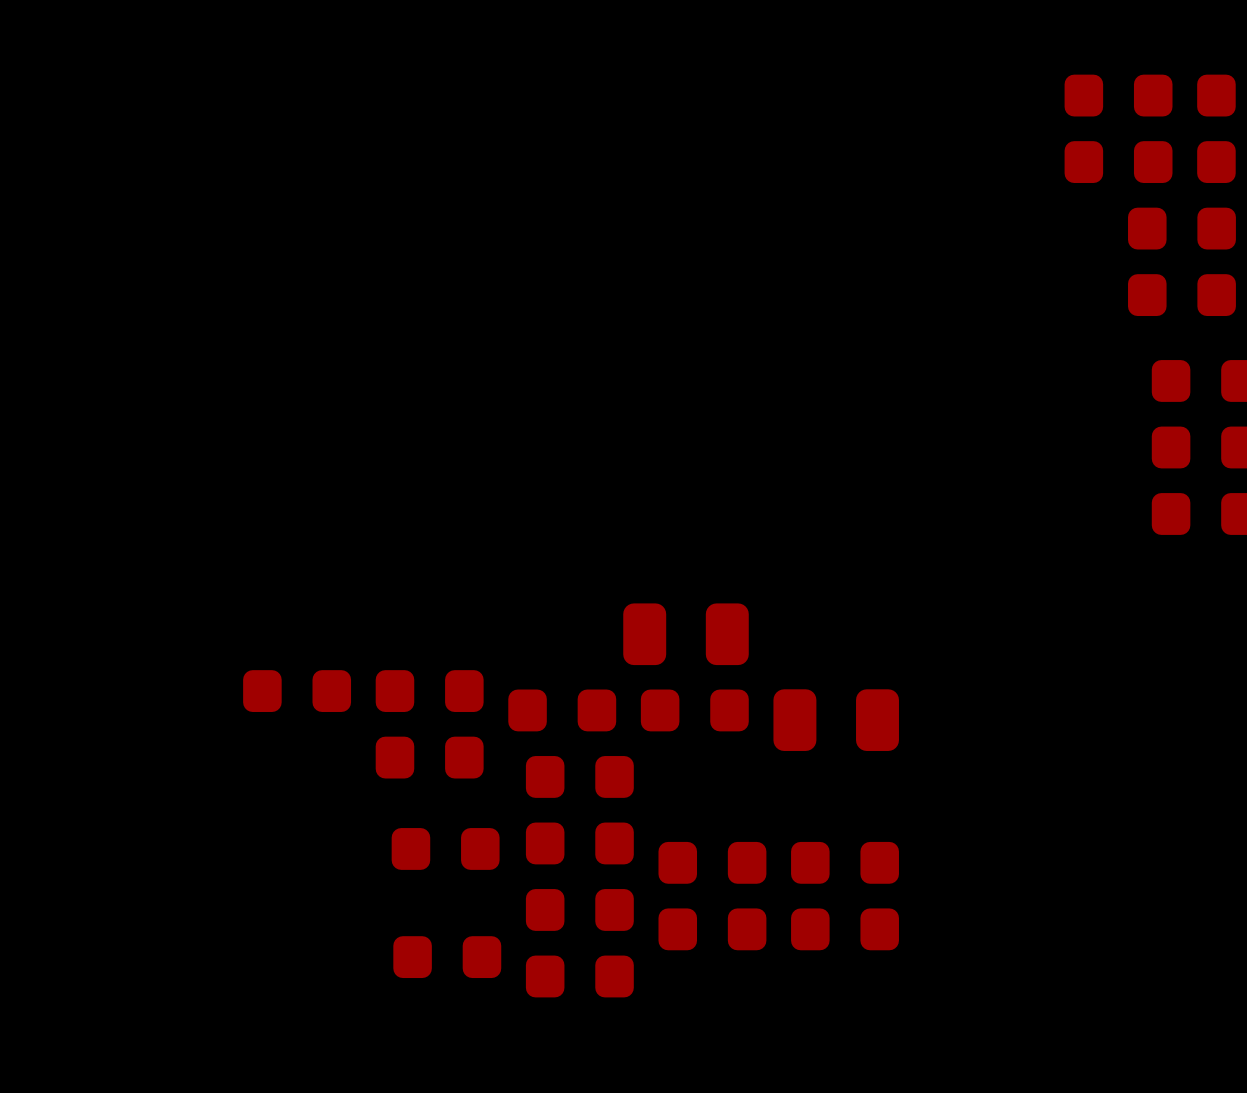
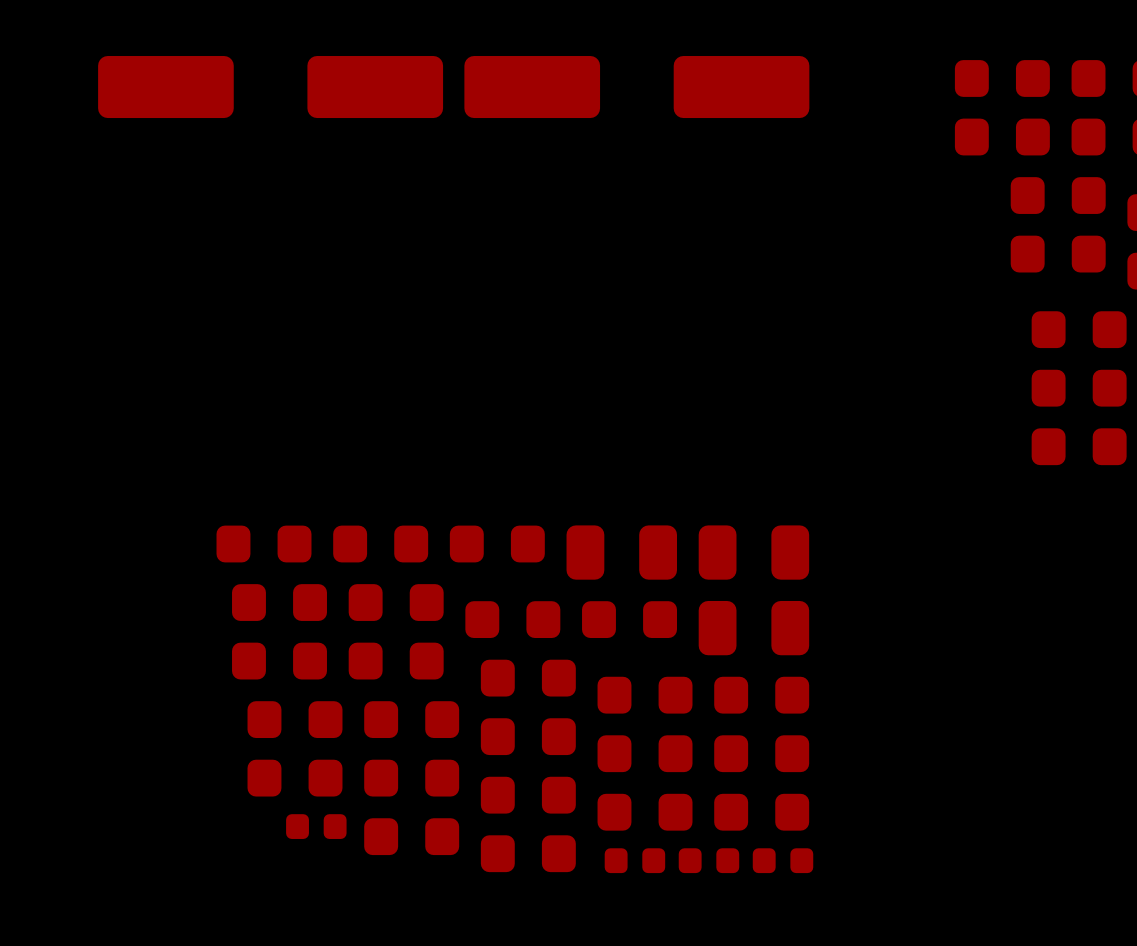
part: none -> (270, 87)
part: none -> (636, 87)
part: none -> (263, 544)
part: none -> (380, 544)
part: none -> (497, 544)
part: none -> (753, 552)
part: none -> (279, 661)
part: none -> (645, 695)
part: none -> (761, 695)
part: none -> (295, 719)
part: none -> (411, 719)
part: (445, 848) -> none
part: none -> (295, 778)
part: none -> (411, 778)
part: none -> (316, 826)
part: none -> (634, 860)
part: none -> (708, 860)
part: none -> (783, 860)

